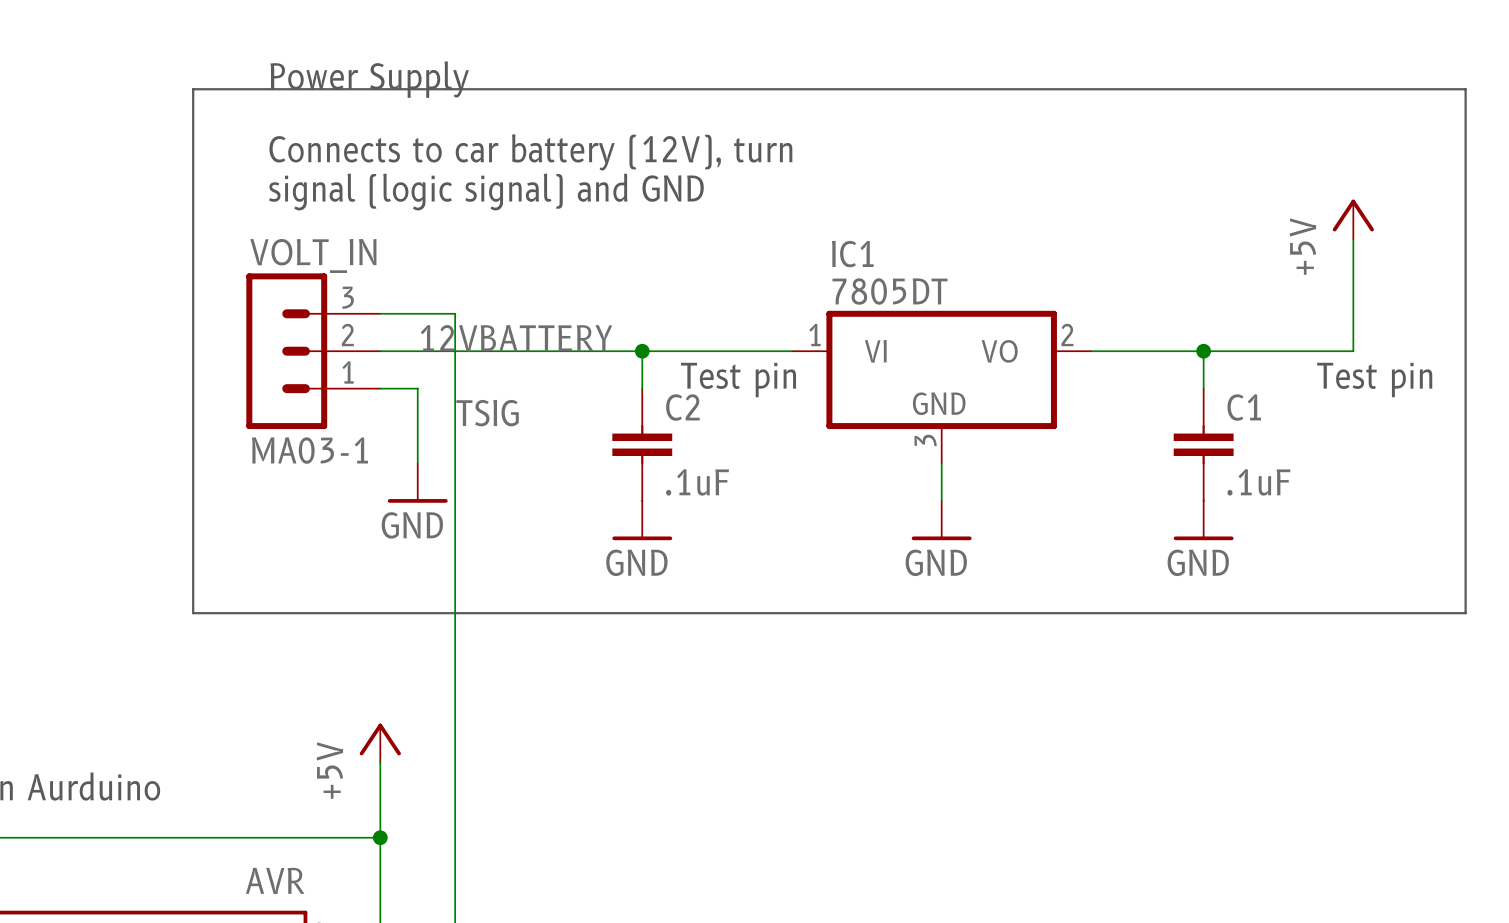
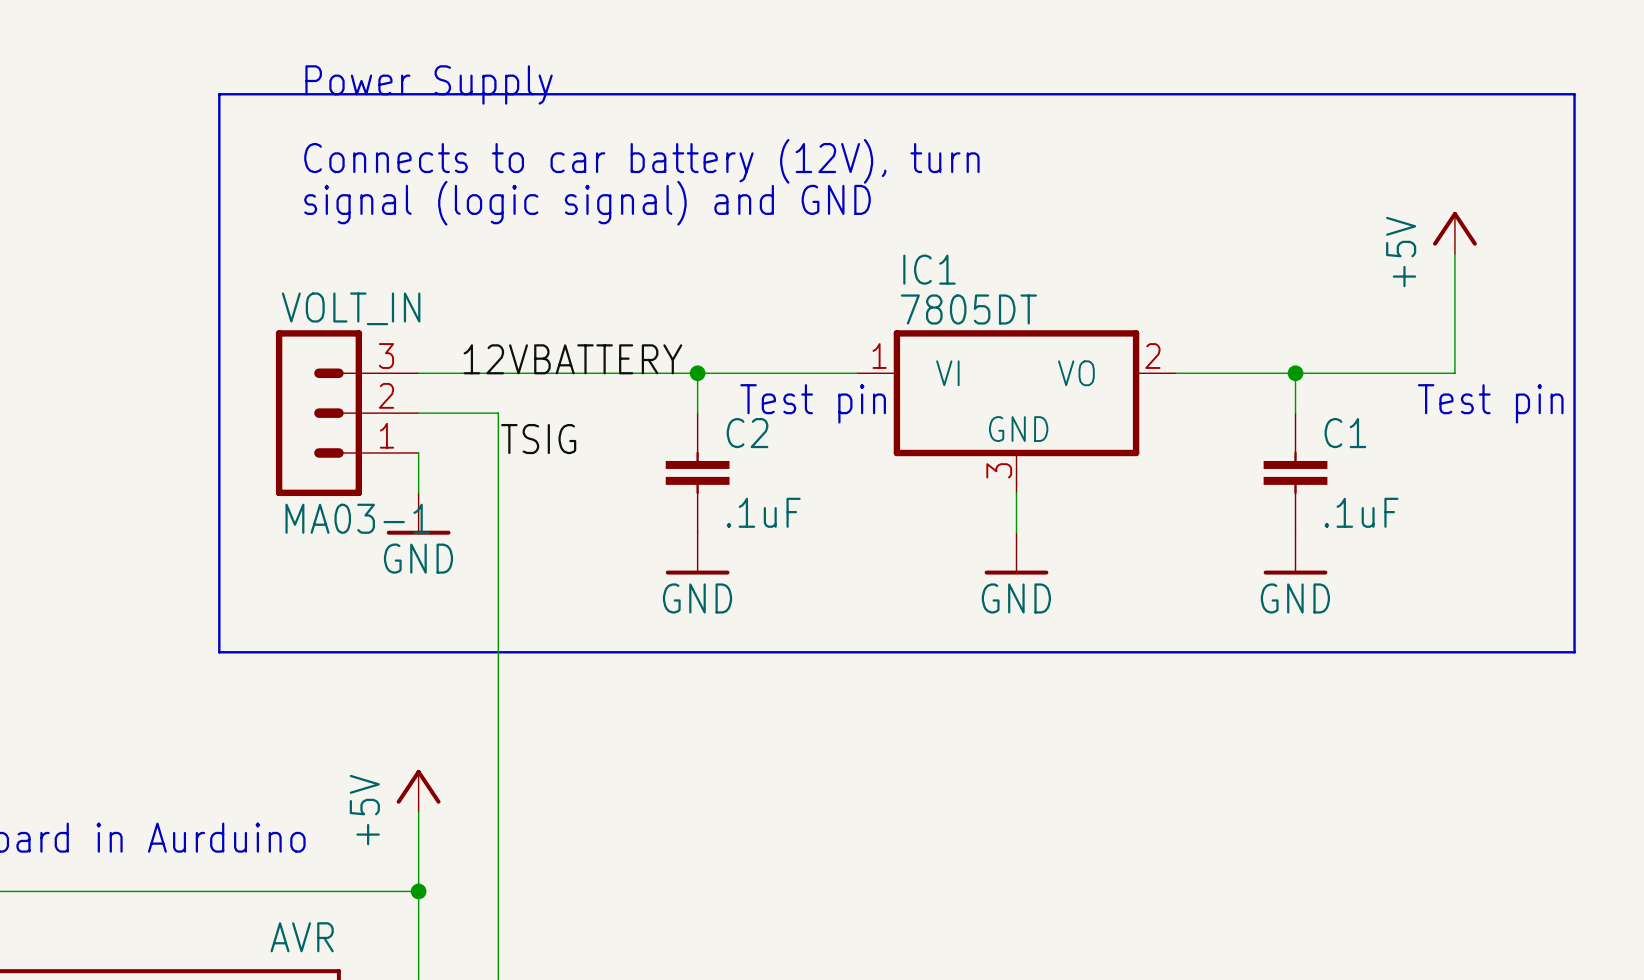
wire: (380, 313) (455, 313) (455, 388) -> (458, 413) (498, 413)
VOLT_IN position: (313, 351) -> (347, 413)
wire: (417, 388) (417, 463) -> none
wire: none -> (418, 452) (418, 492)
power symbol position: GND (417, 483) -> GND (418, 513)

